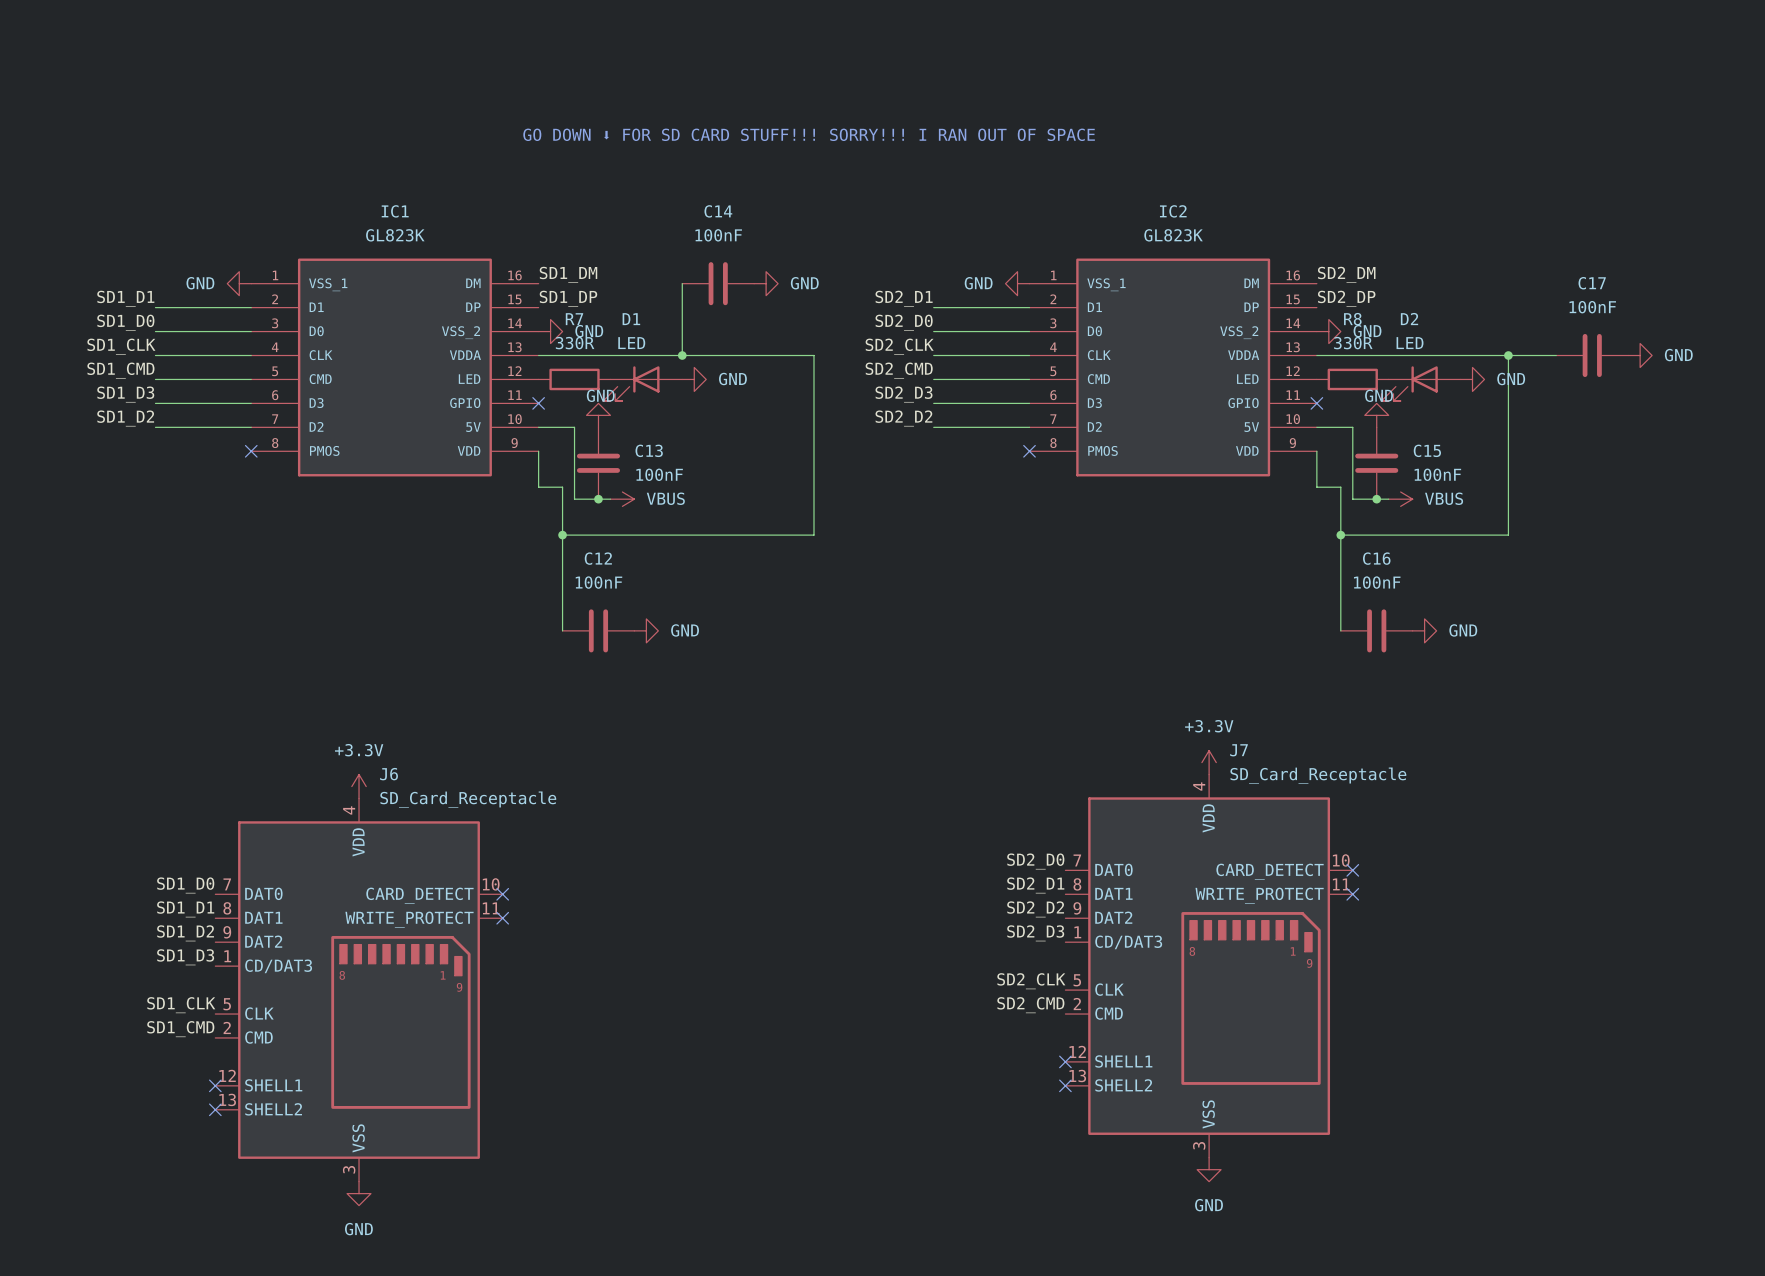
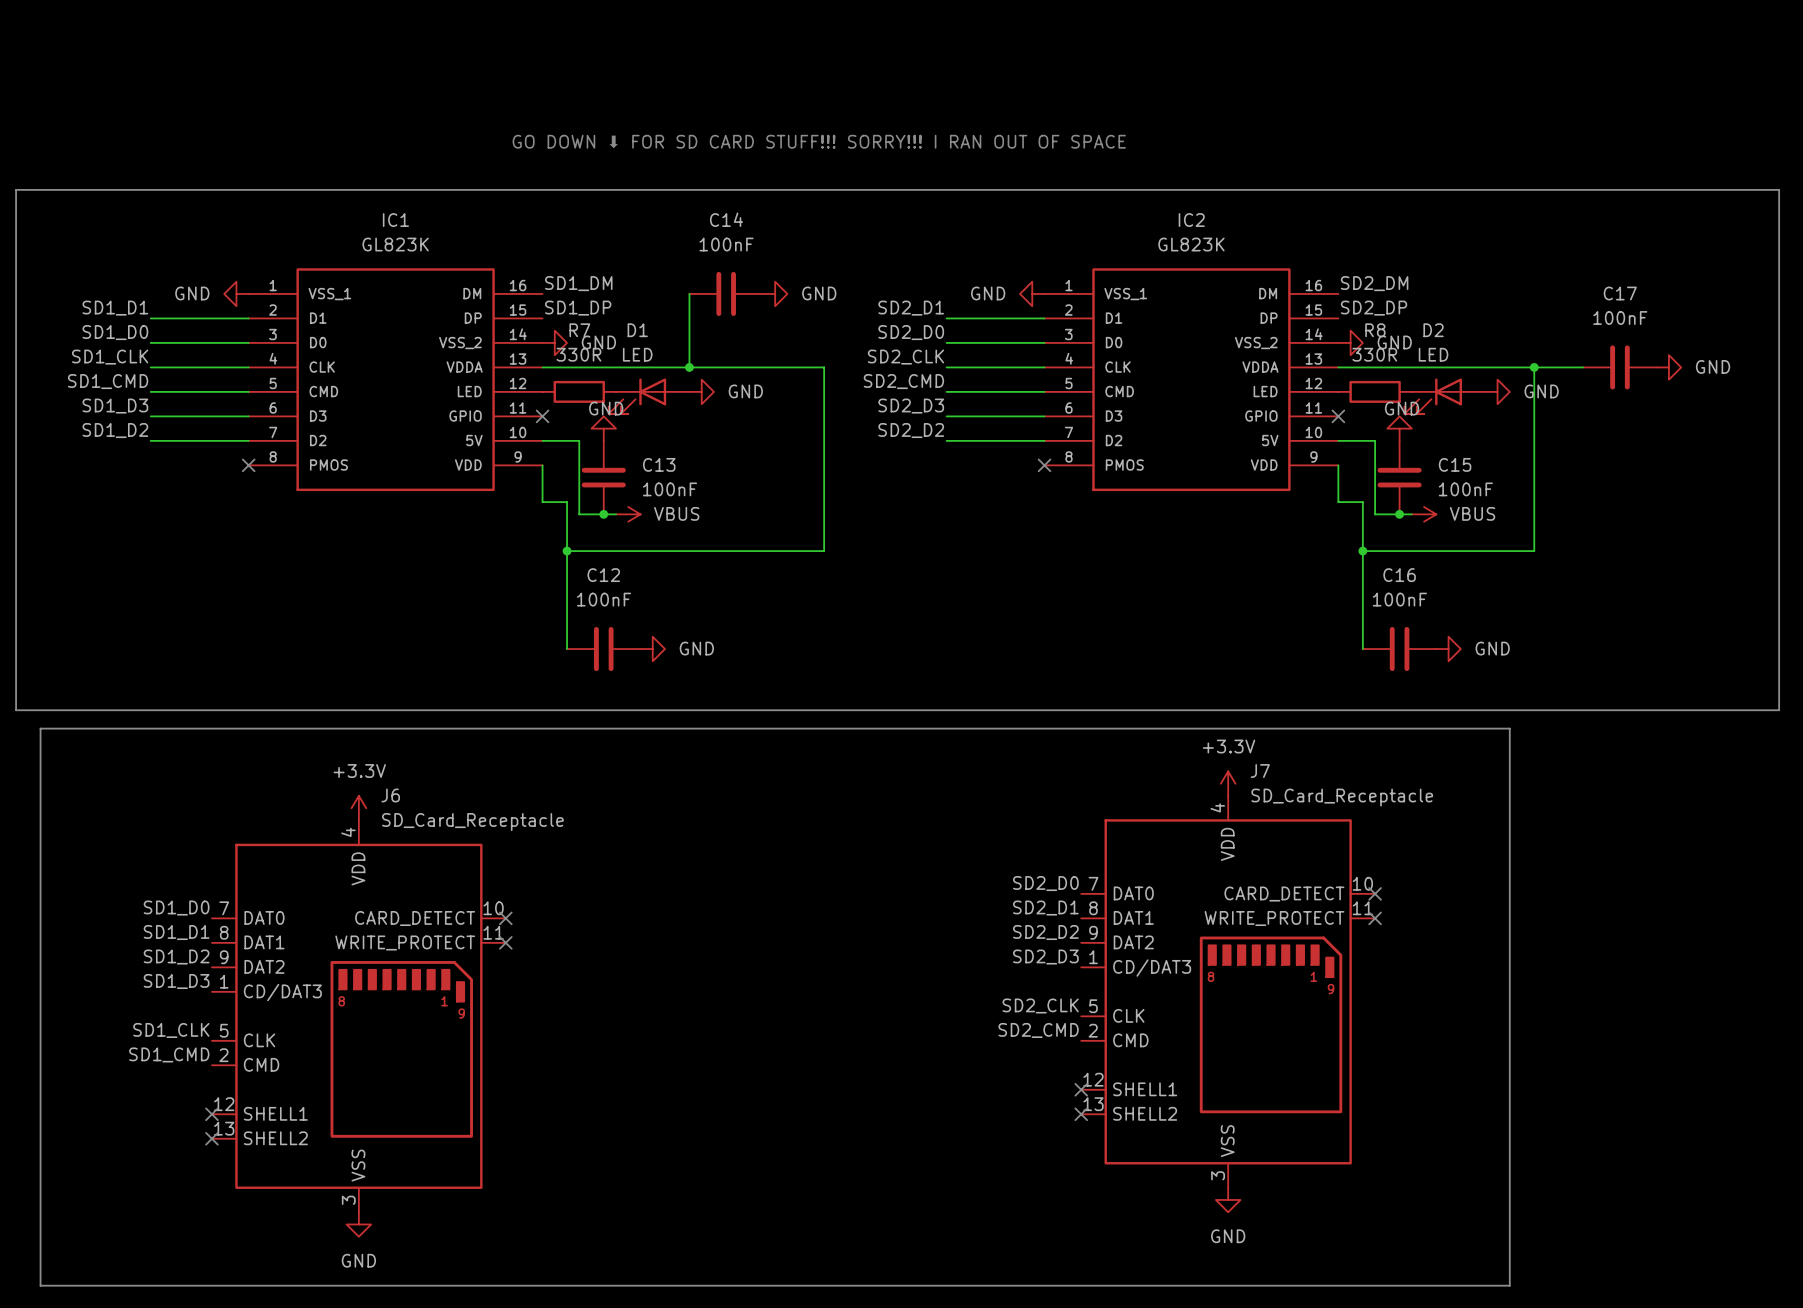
line: none -> (16, 189) (1779, 189) (1779, 710) (16, 710) (16, 189)
line: none -> (40, 728) (1509, 728) (1509, 1285) (40, 1285) (40, 728)

